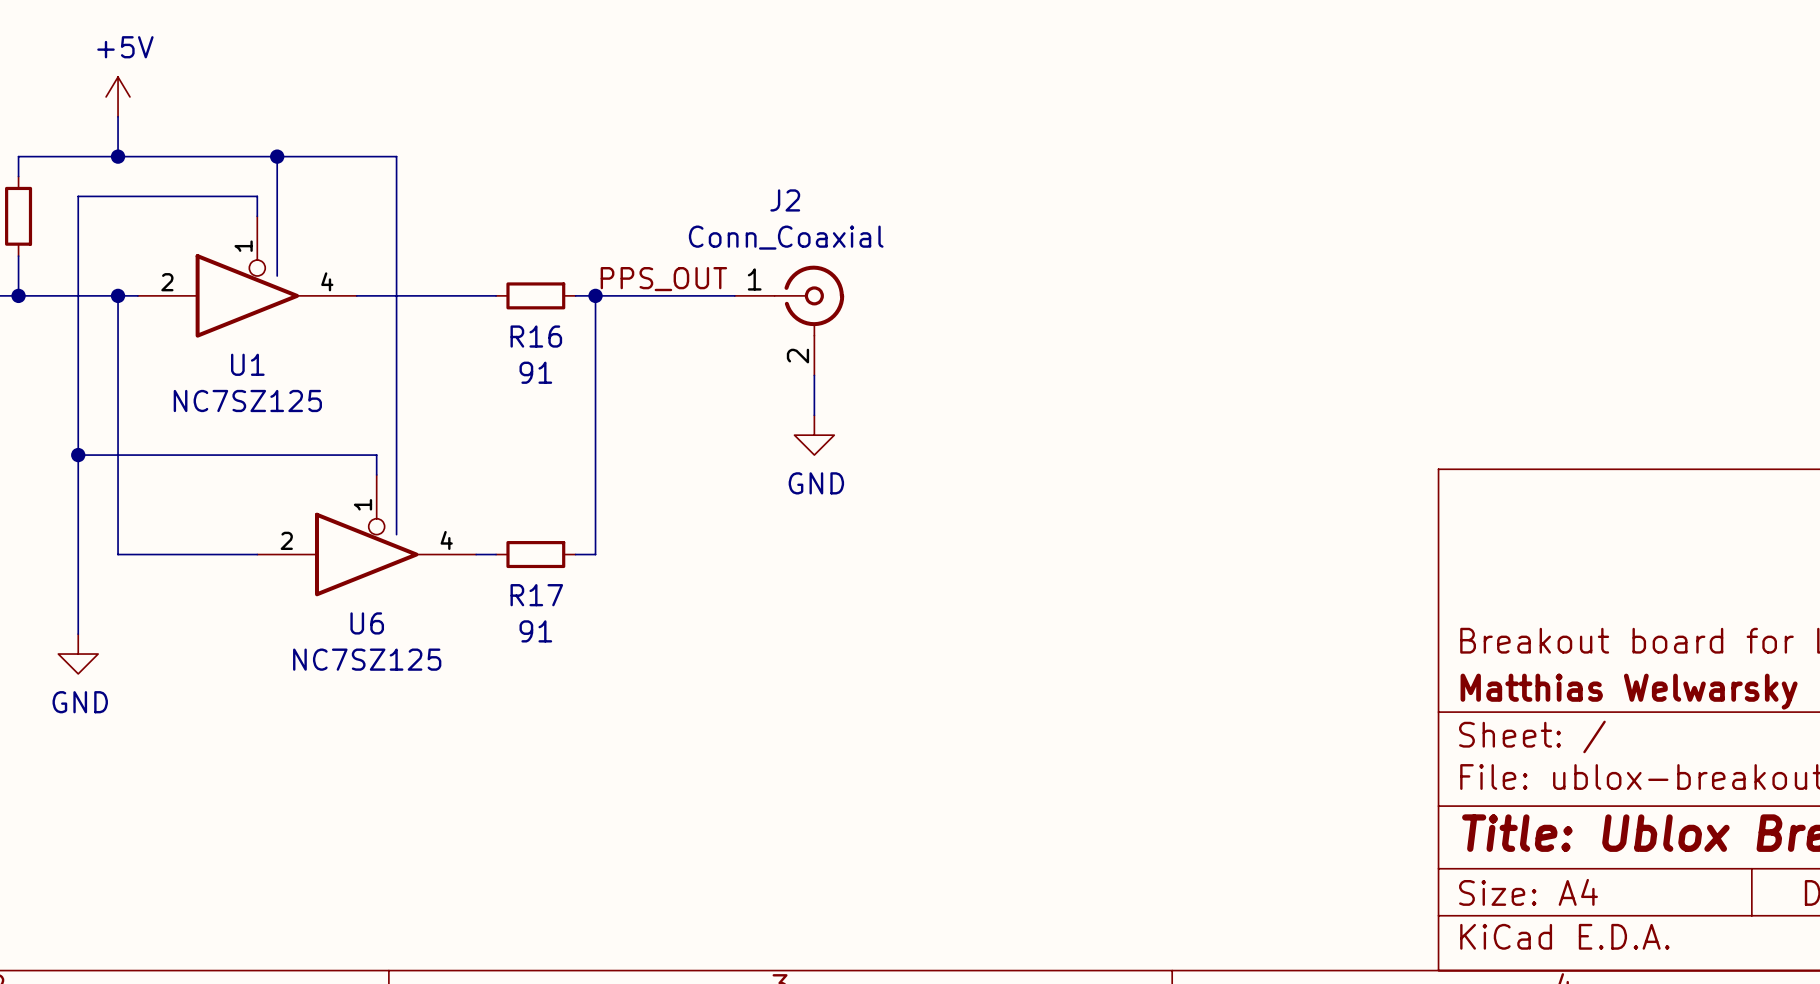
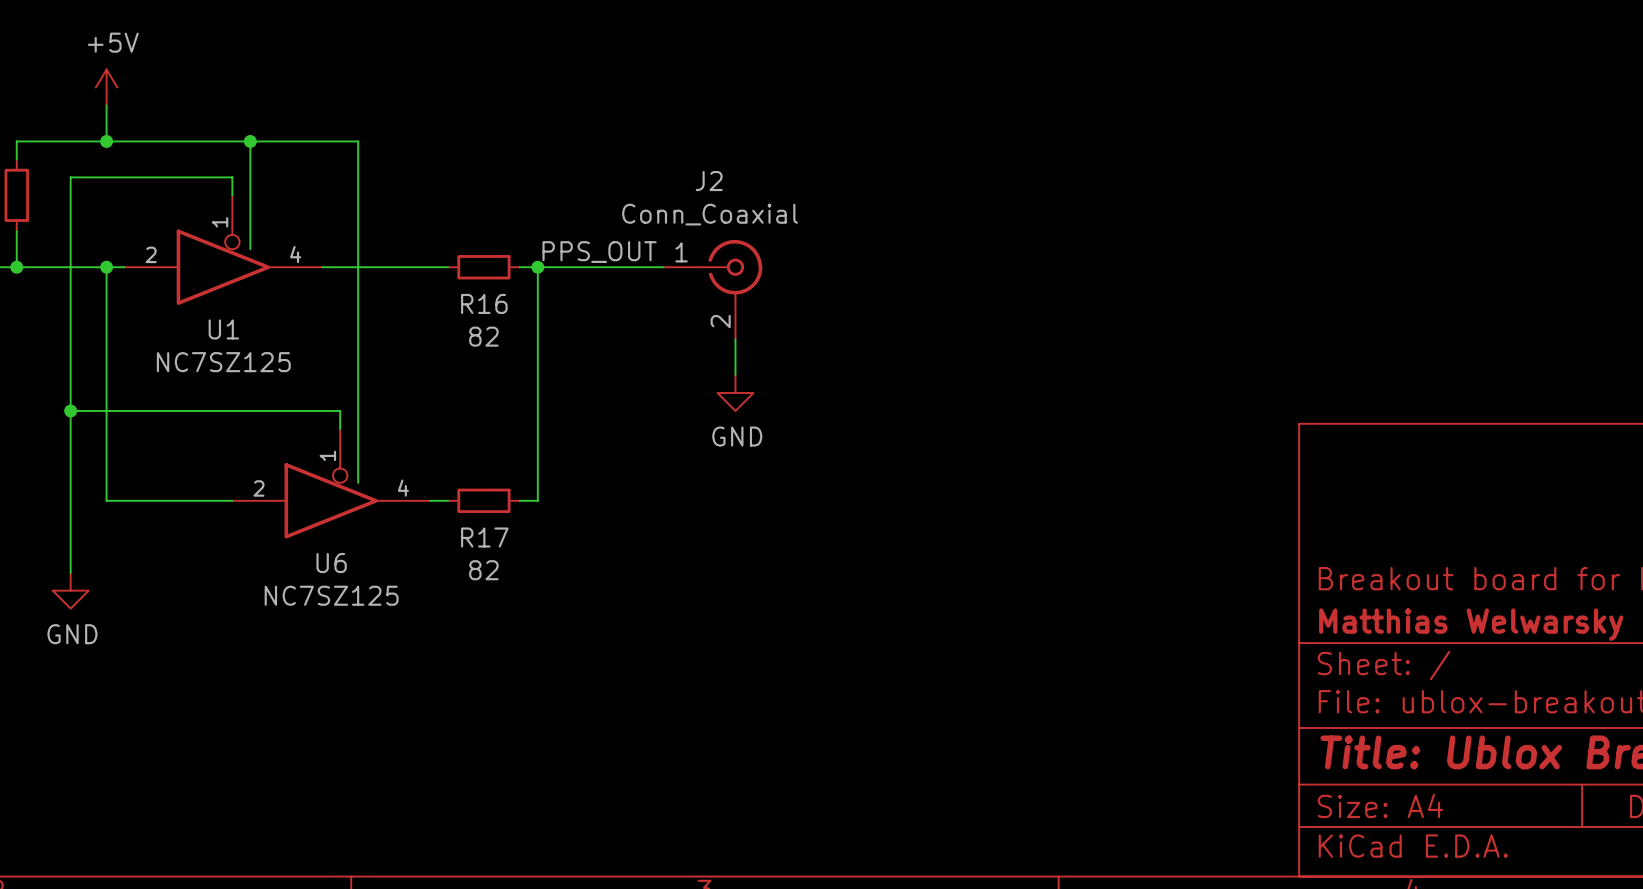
R16 value: 91 (535, 372) -> 82 (483, 336)
R17 value: 91 (535, 631) -> 82 (483, 570)

